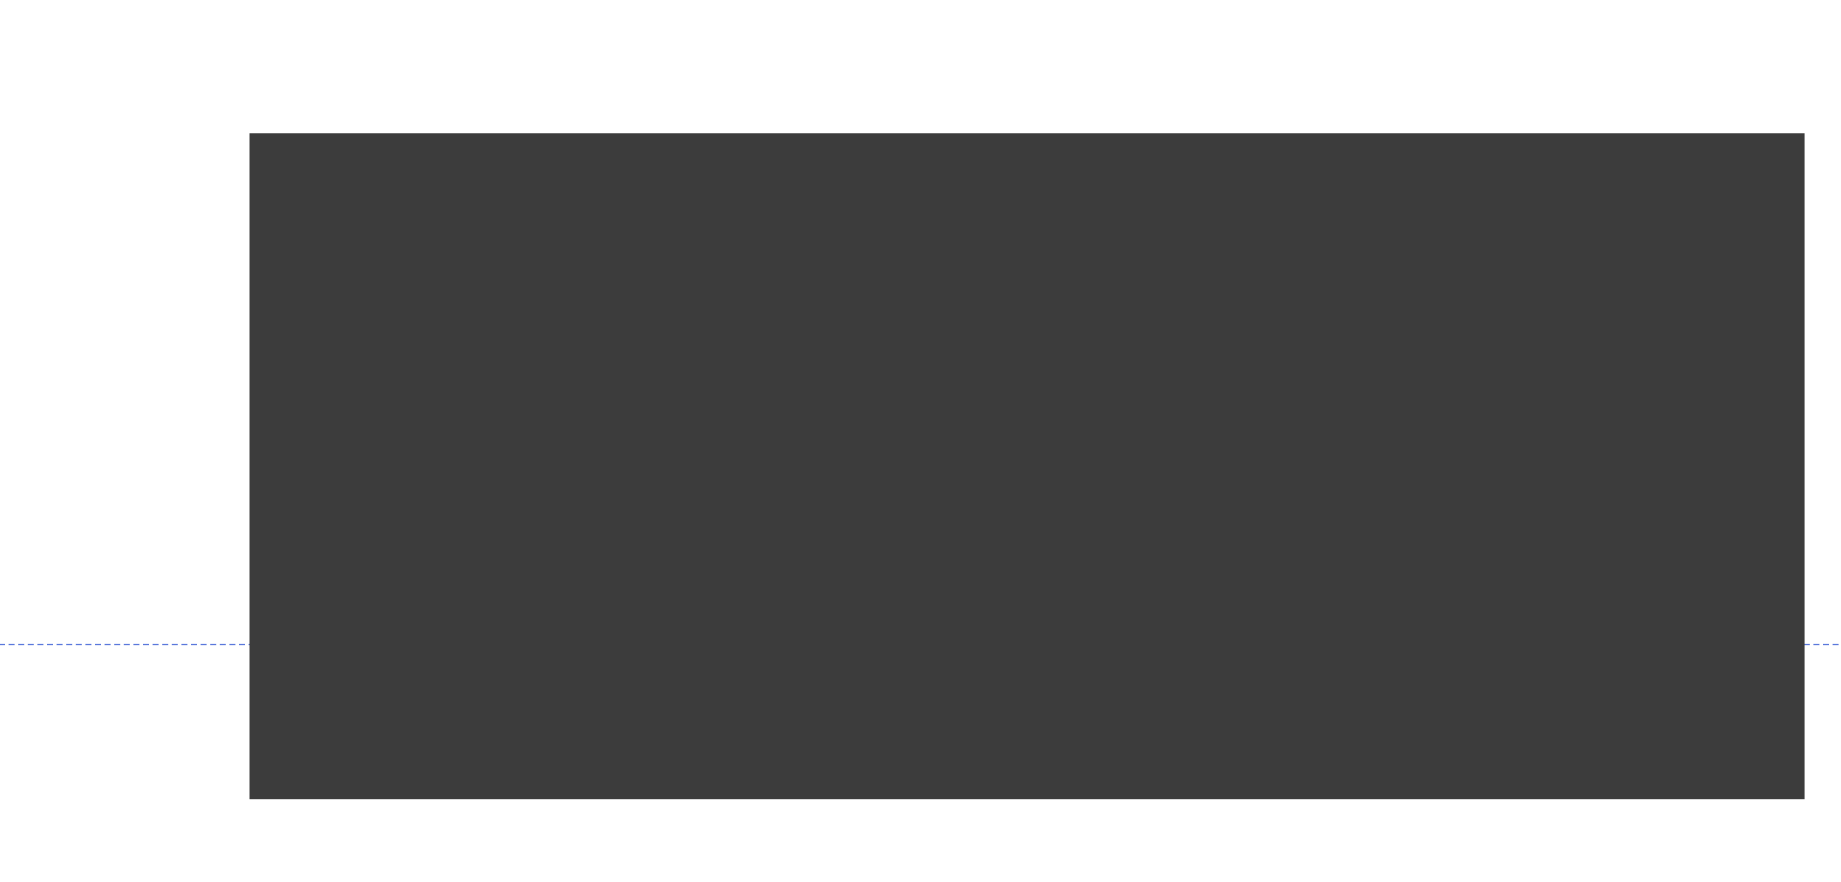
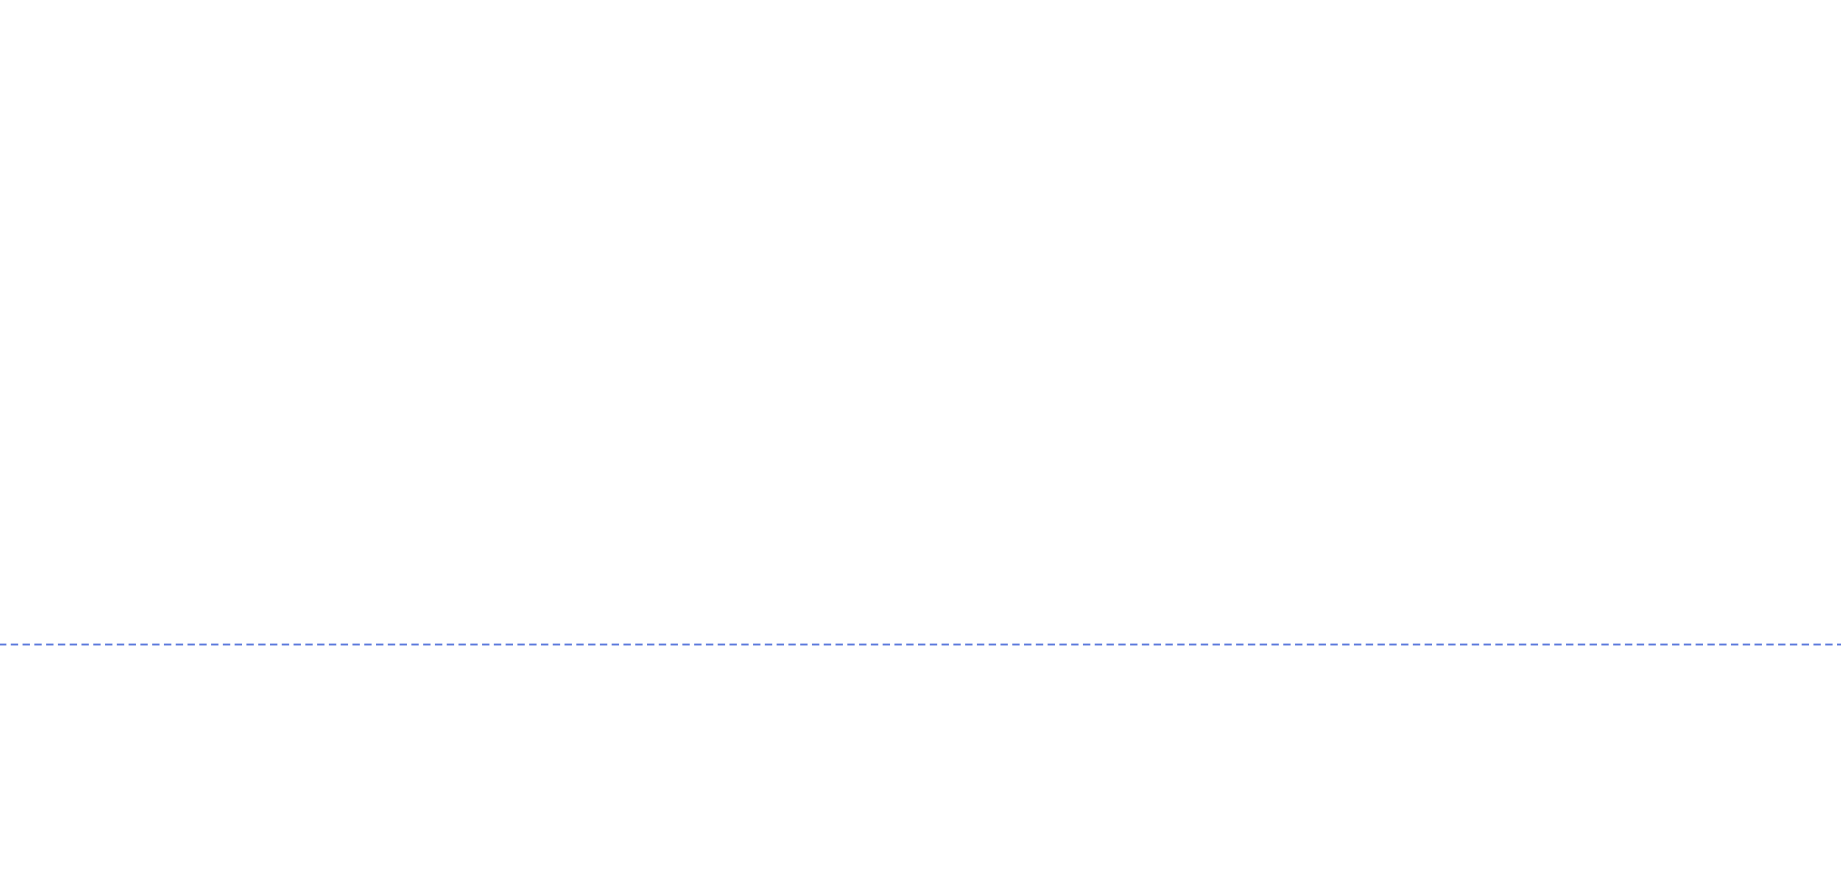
part: (1027, 466) -> none

